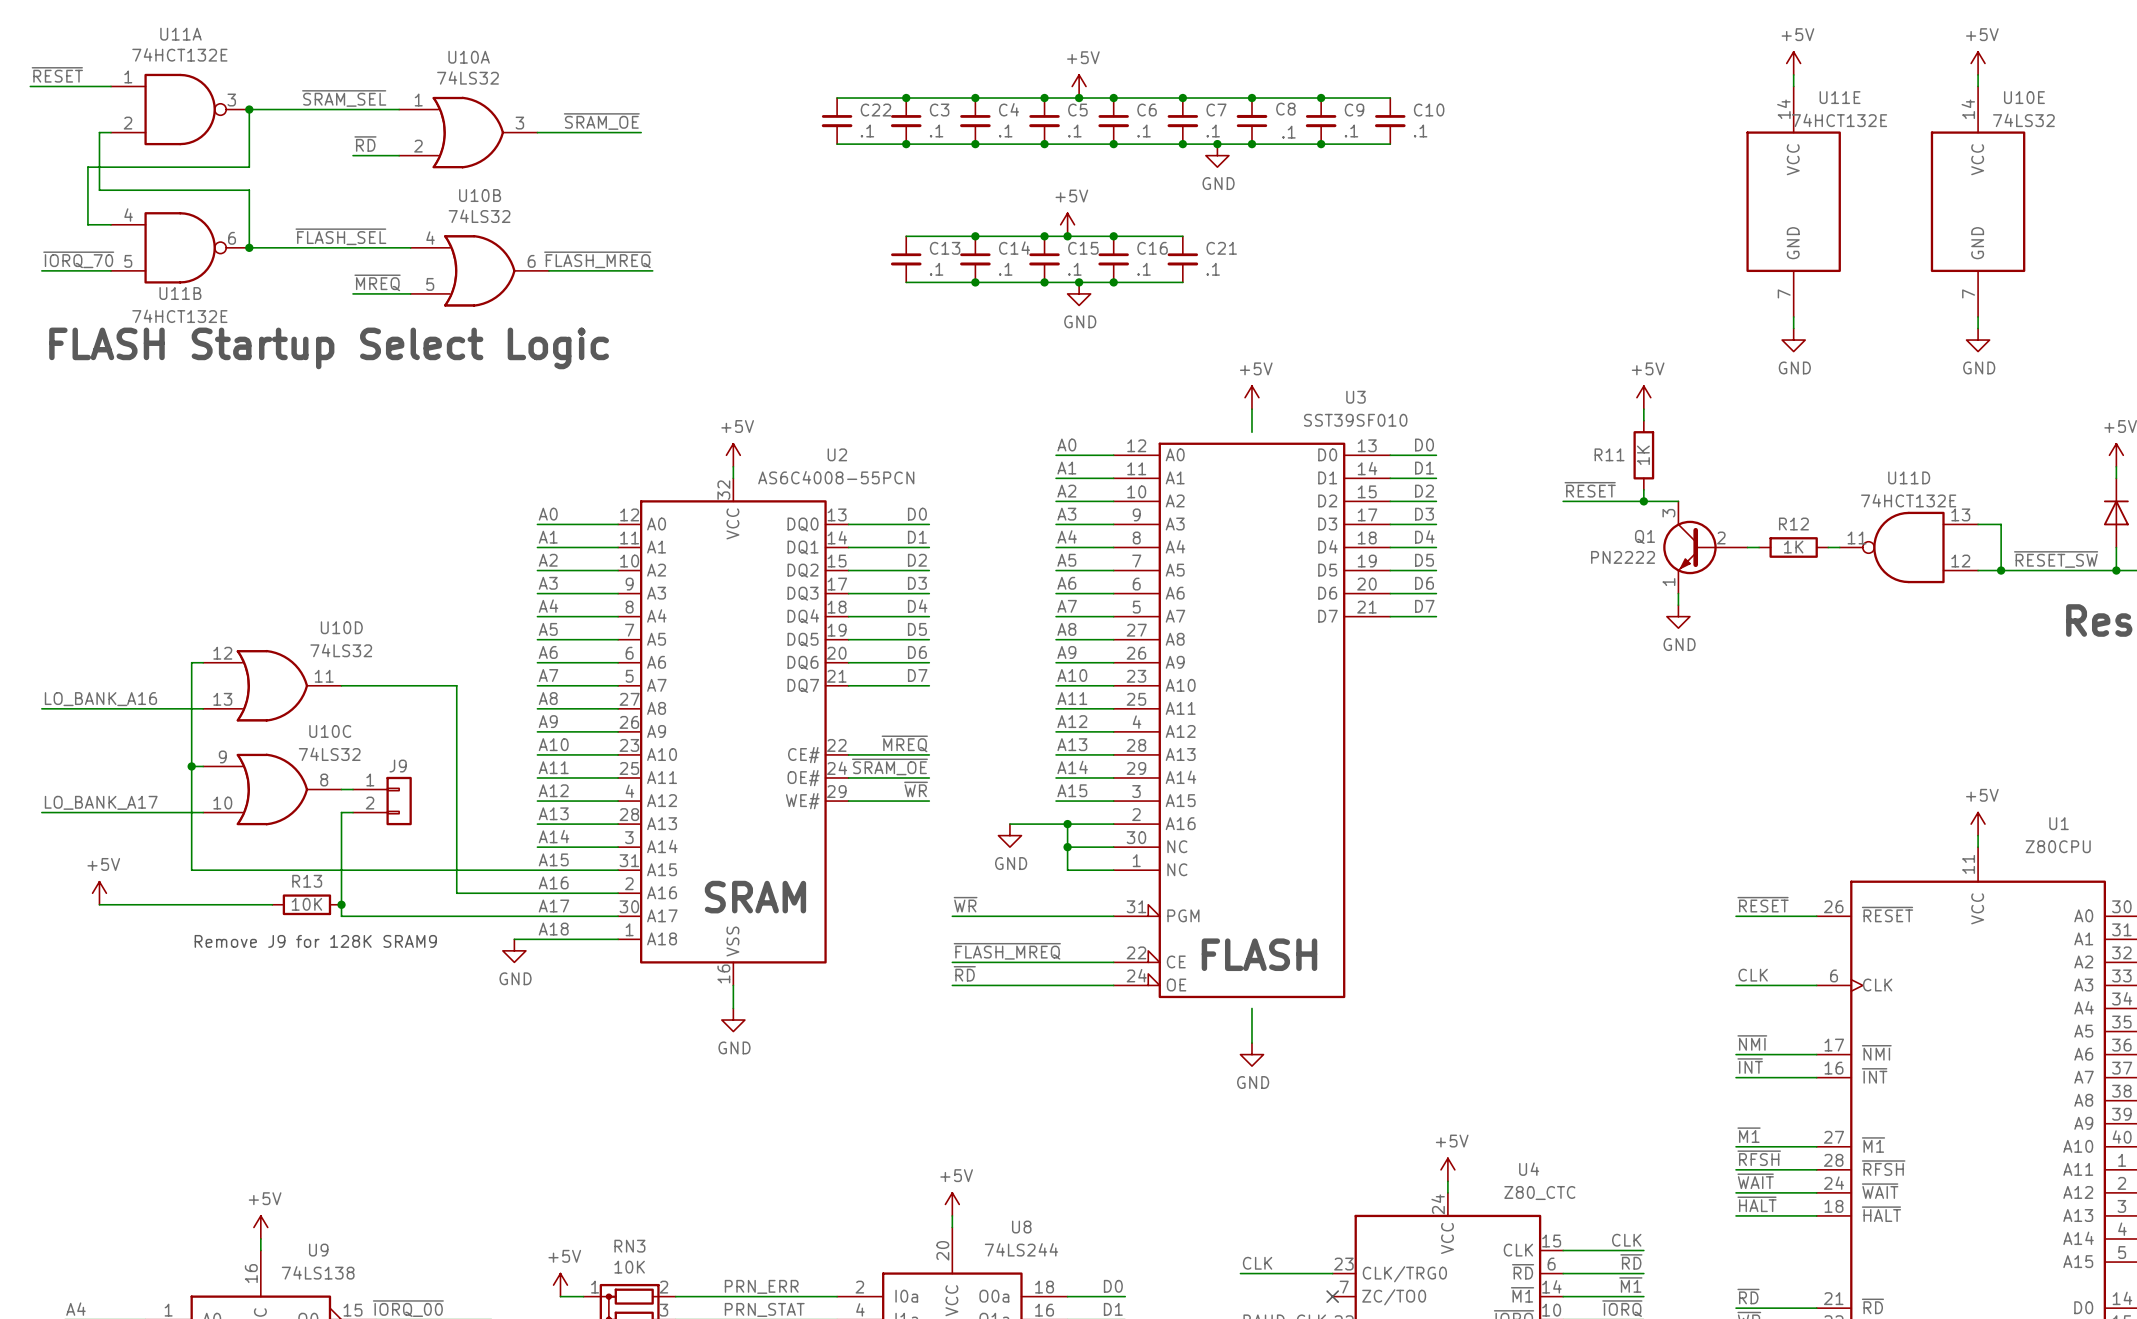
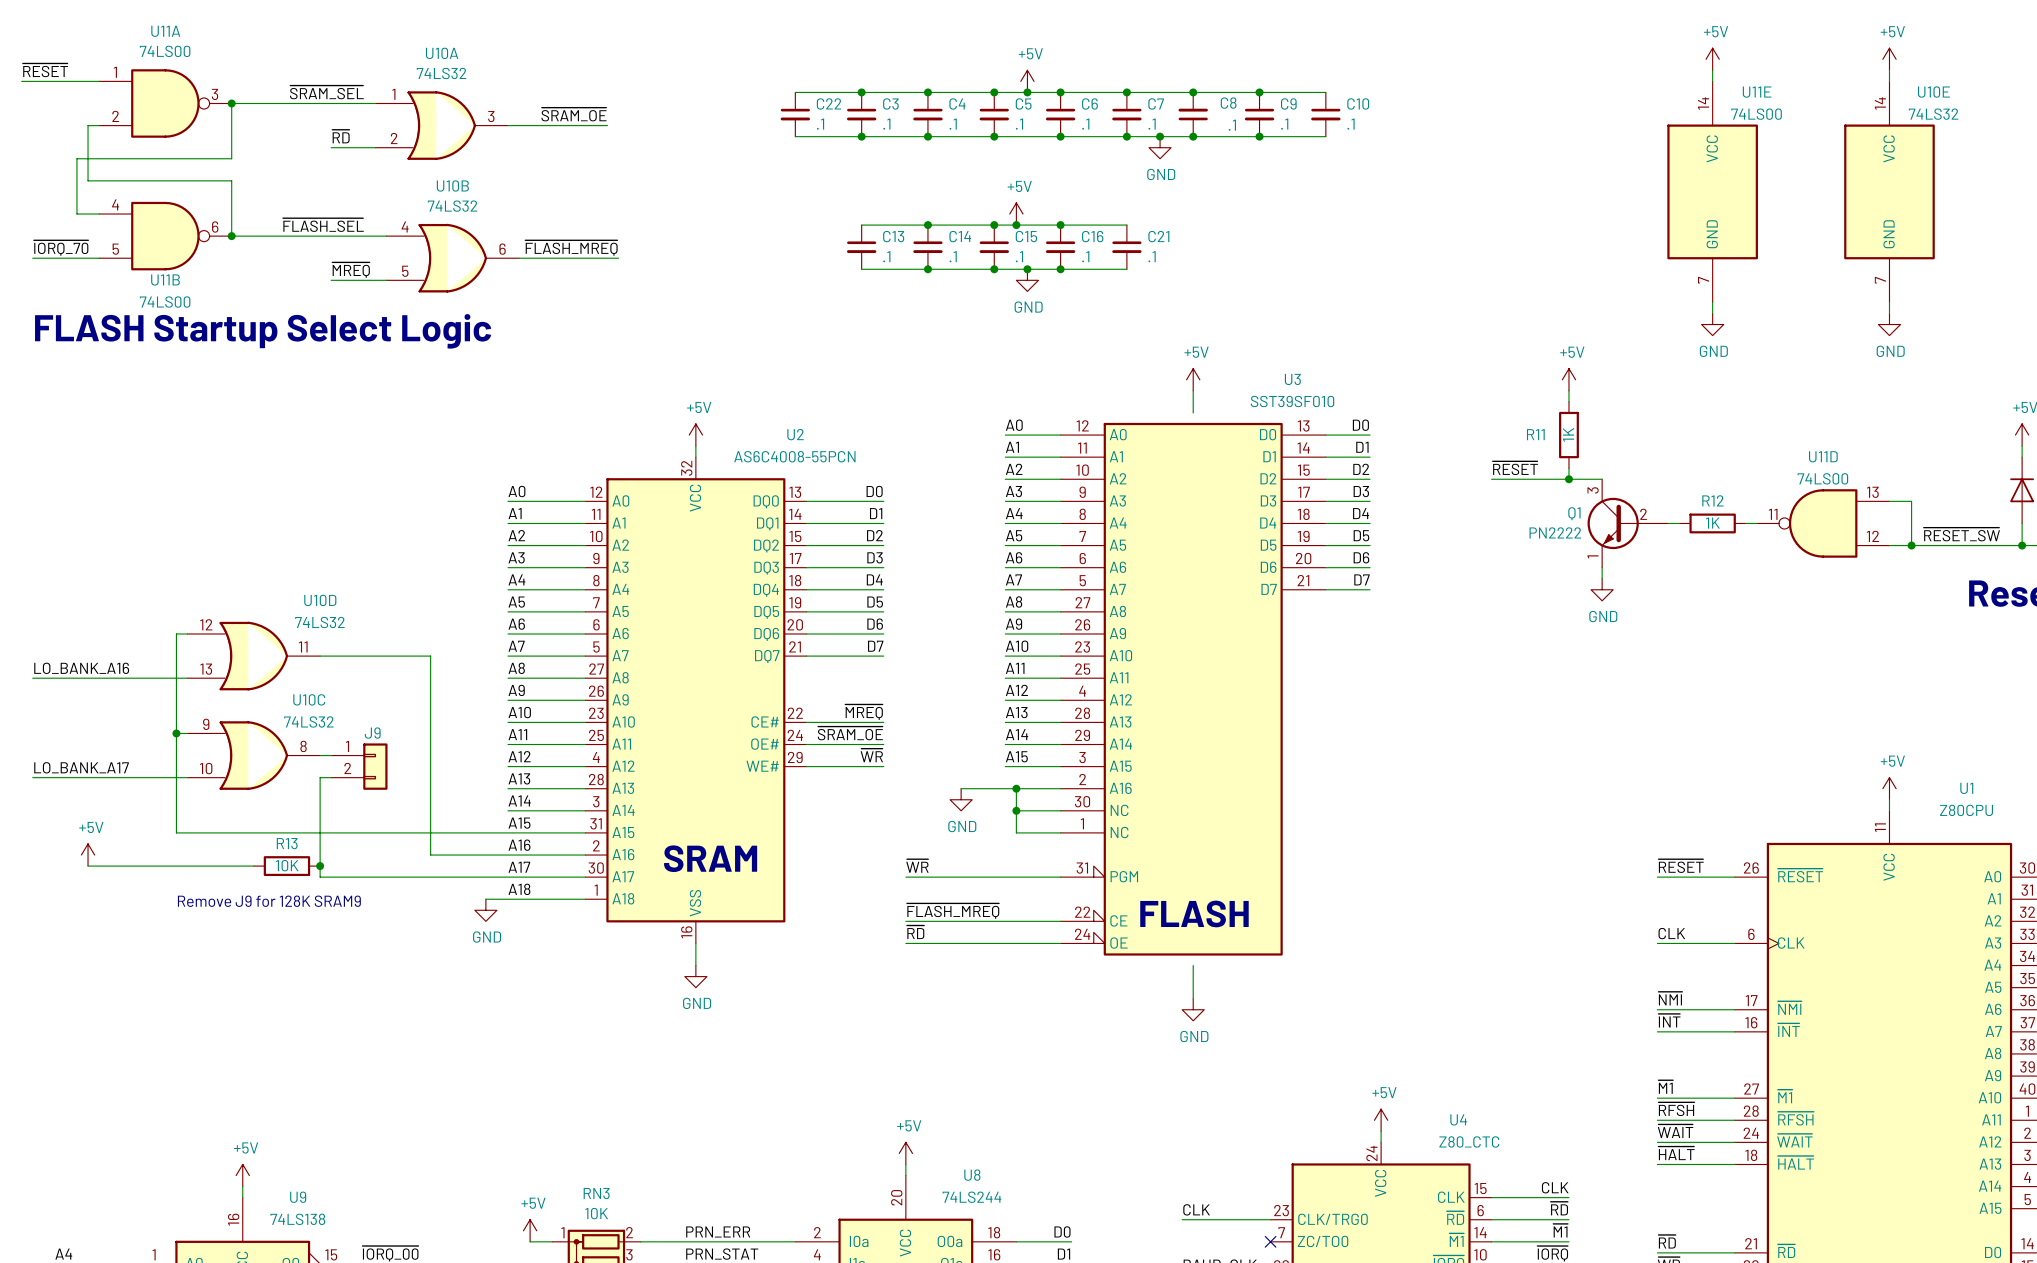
U11A value: 74HCT132E (179, 54) -> 74LS00 (165, 51)
U11E value: 74HCT132E (1839, 120) -> 74LS00 (1756, 114)
U11B value: 74HCT132E (179, 316) -> 74LS00 (165, 302)
U11D value: 74HCT132E (1908, 500) -> 74LS00 (1822, 478)

